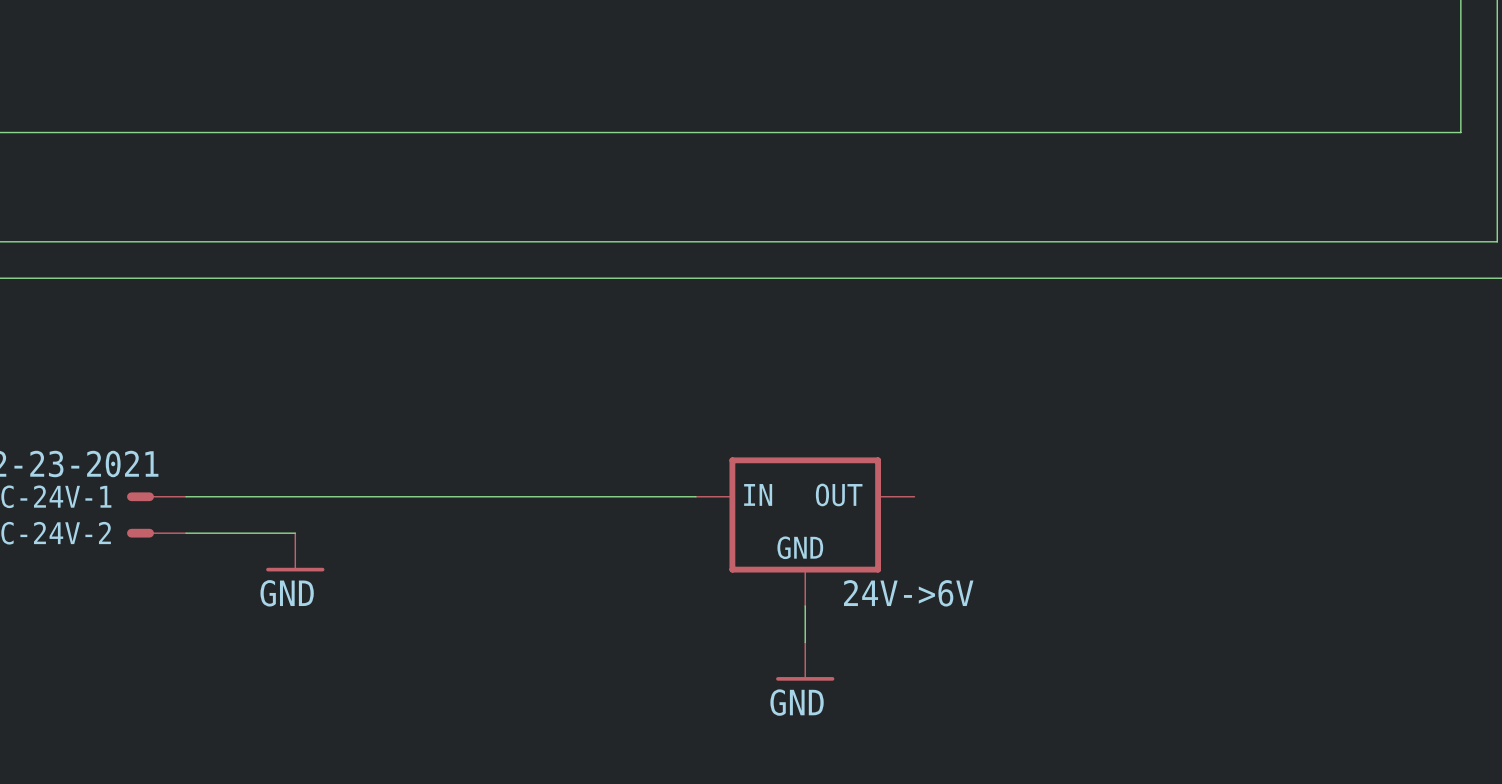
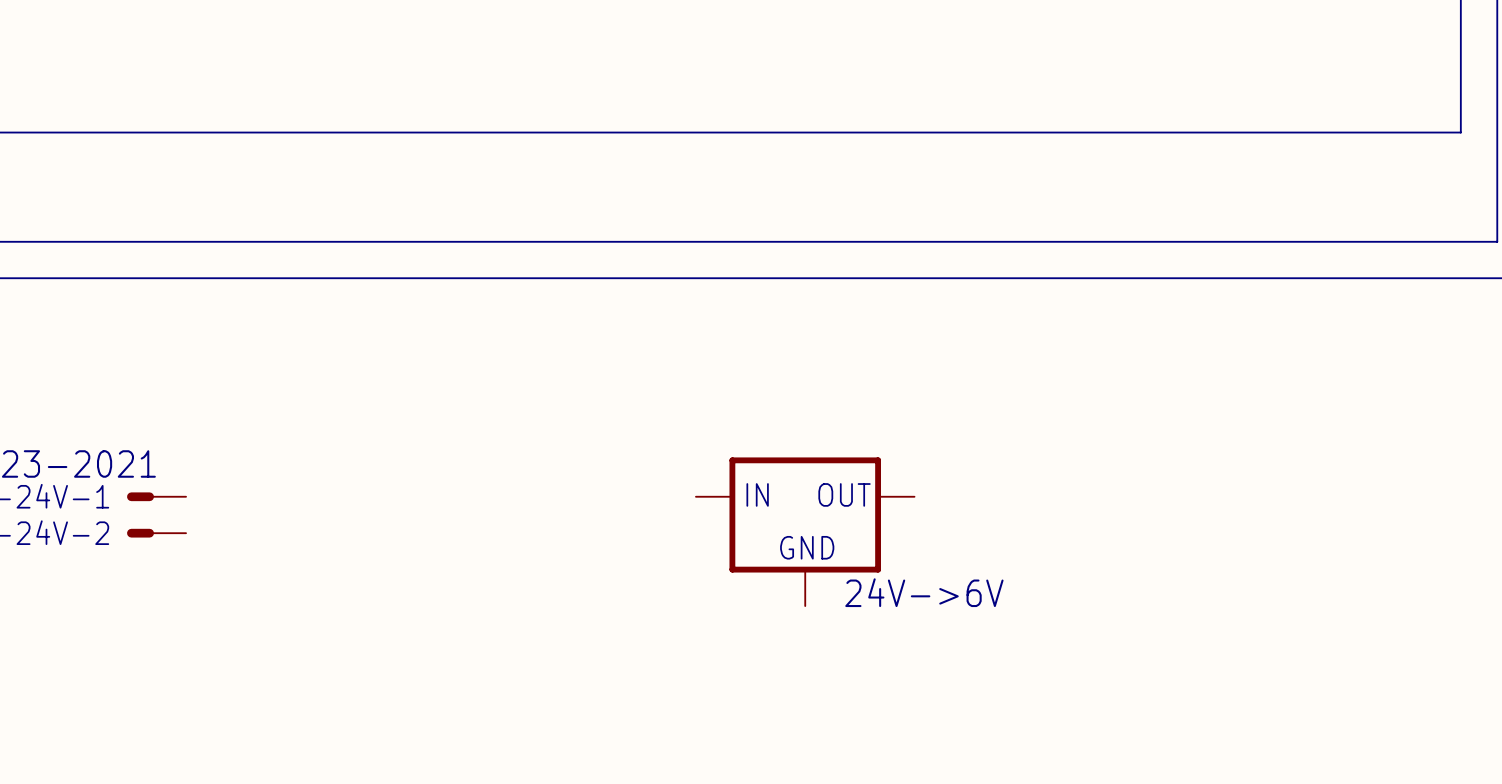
wire: (186, 496) (695, 496) -> none
wire: (186, 533) (295, 533) -> none
power symbol: GND (295, 552) -> none
wire: (805, 606) (805, 642) -> none
power symbol: GND (805, 661) -> none

